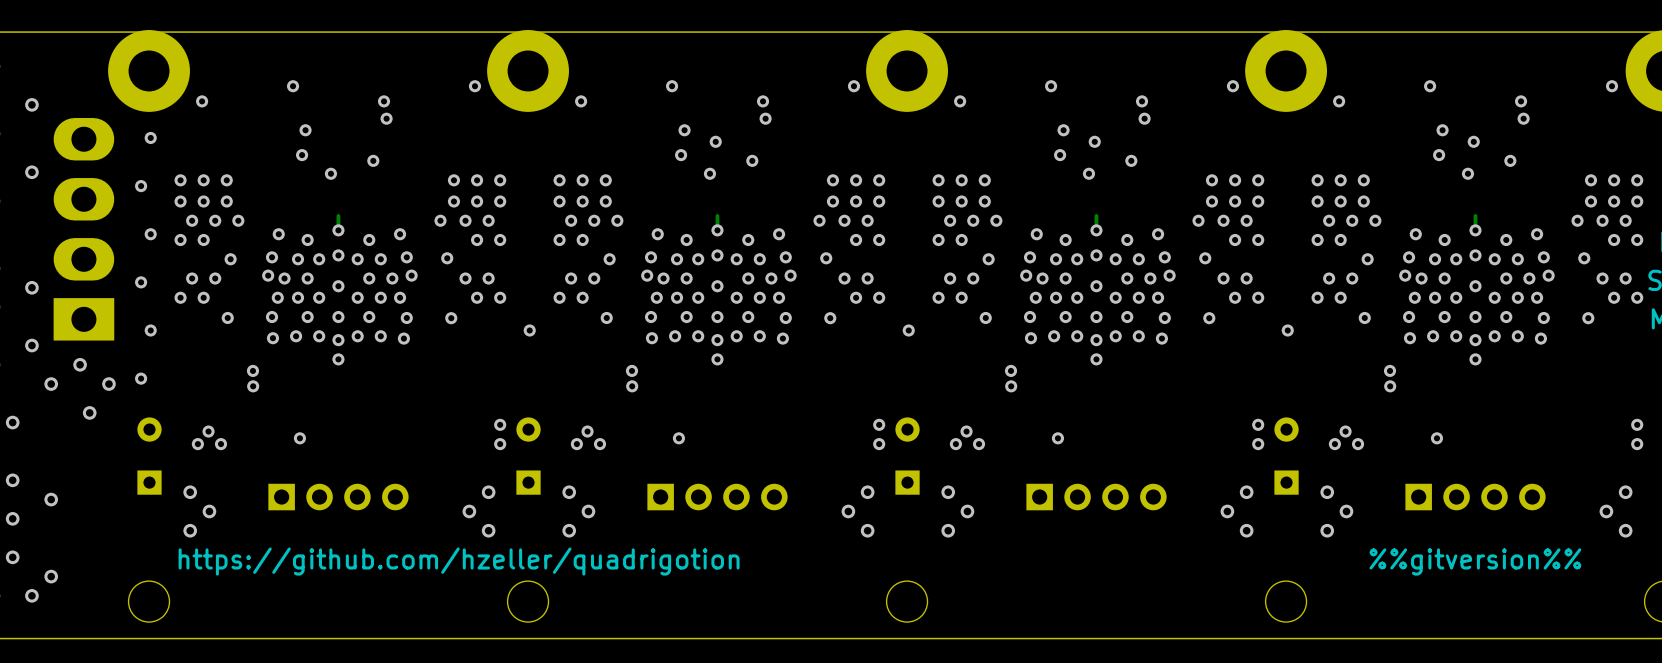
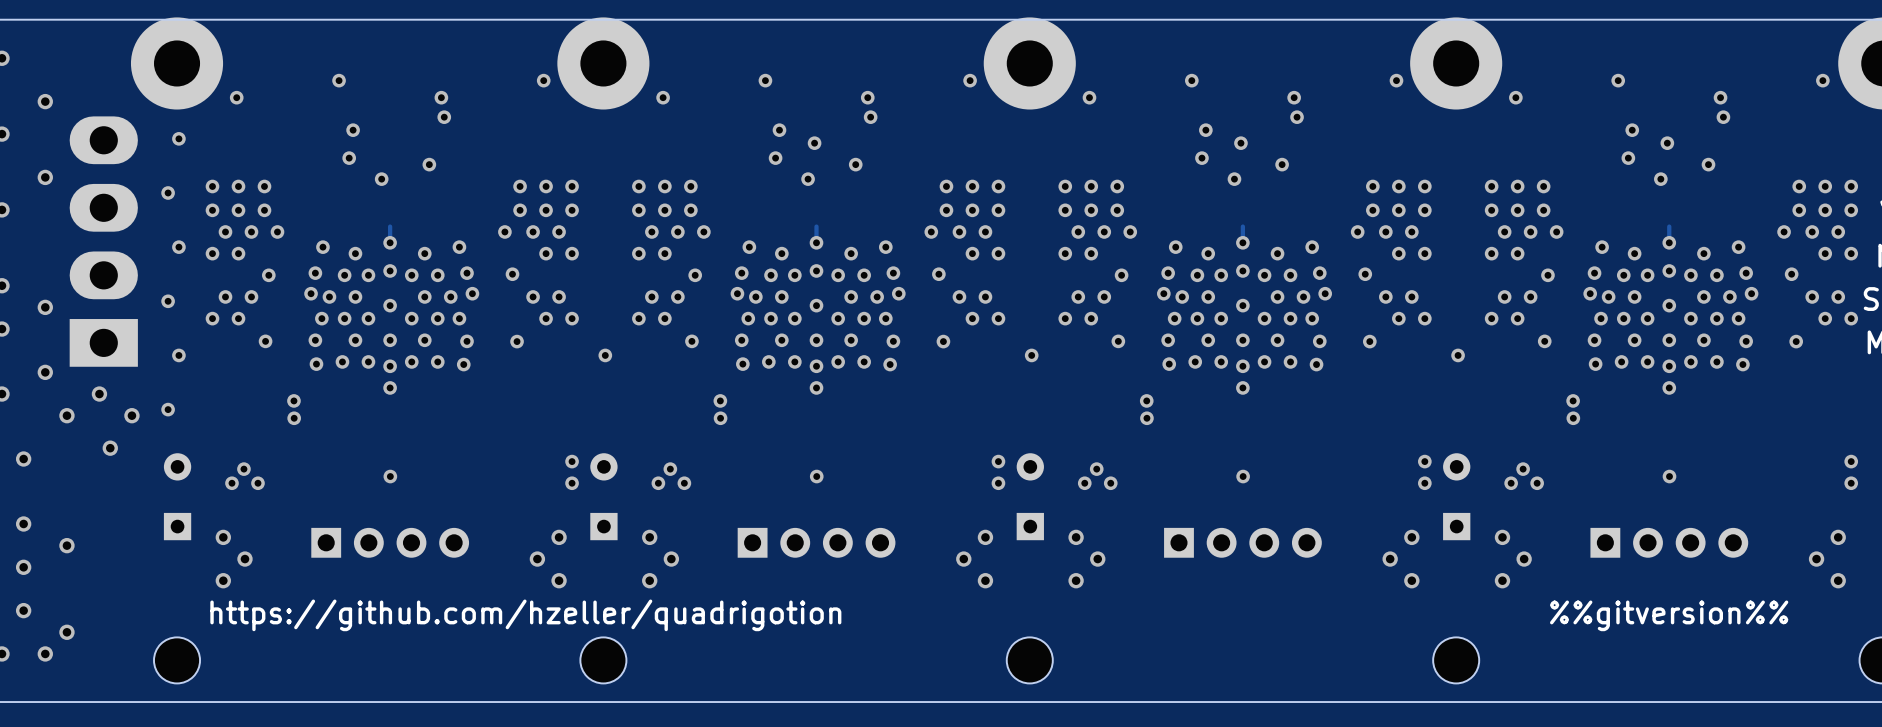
via position: (299, 438) -> (390, 476)
via position: (678, 438) -> (816, 476)
via position: (1057, 438) -> (1243, 476)
via position: (1436, 438) -> (1669, 476)

